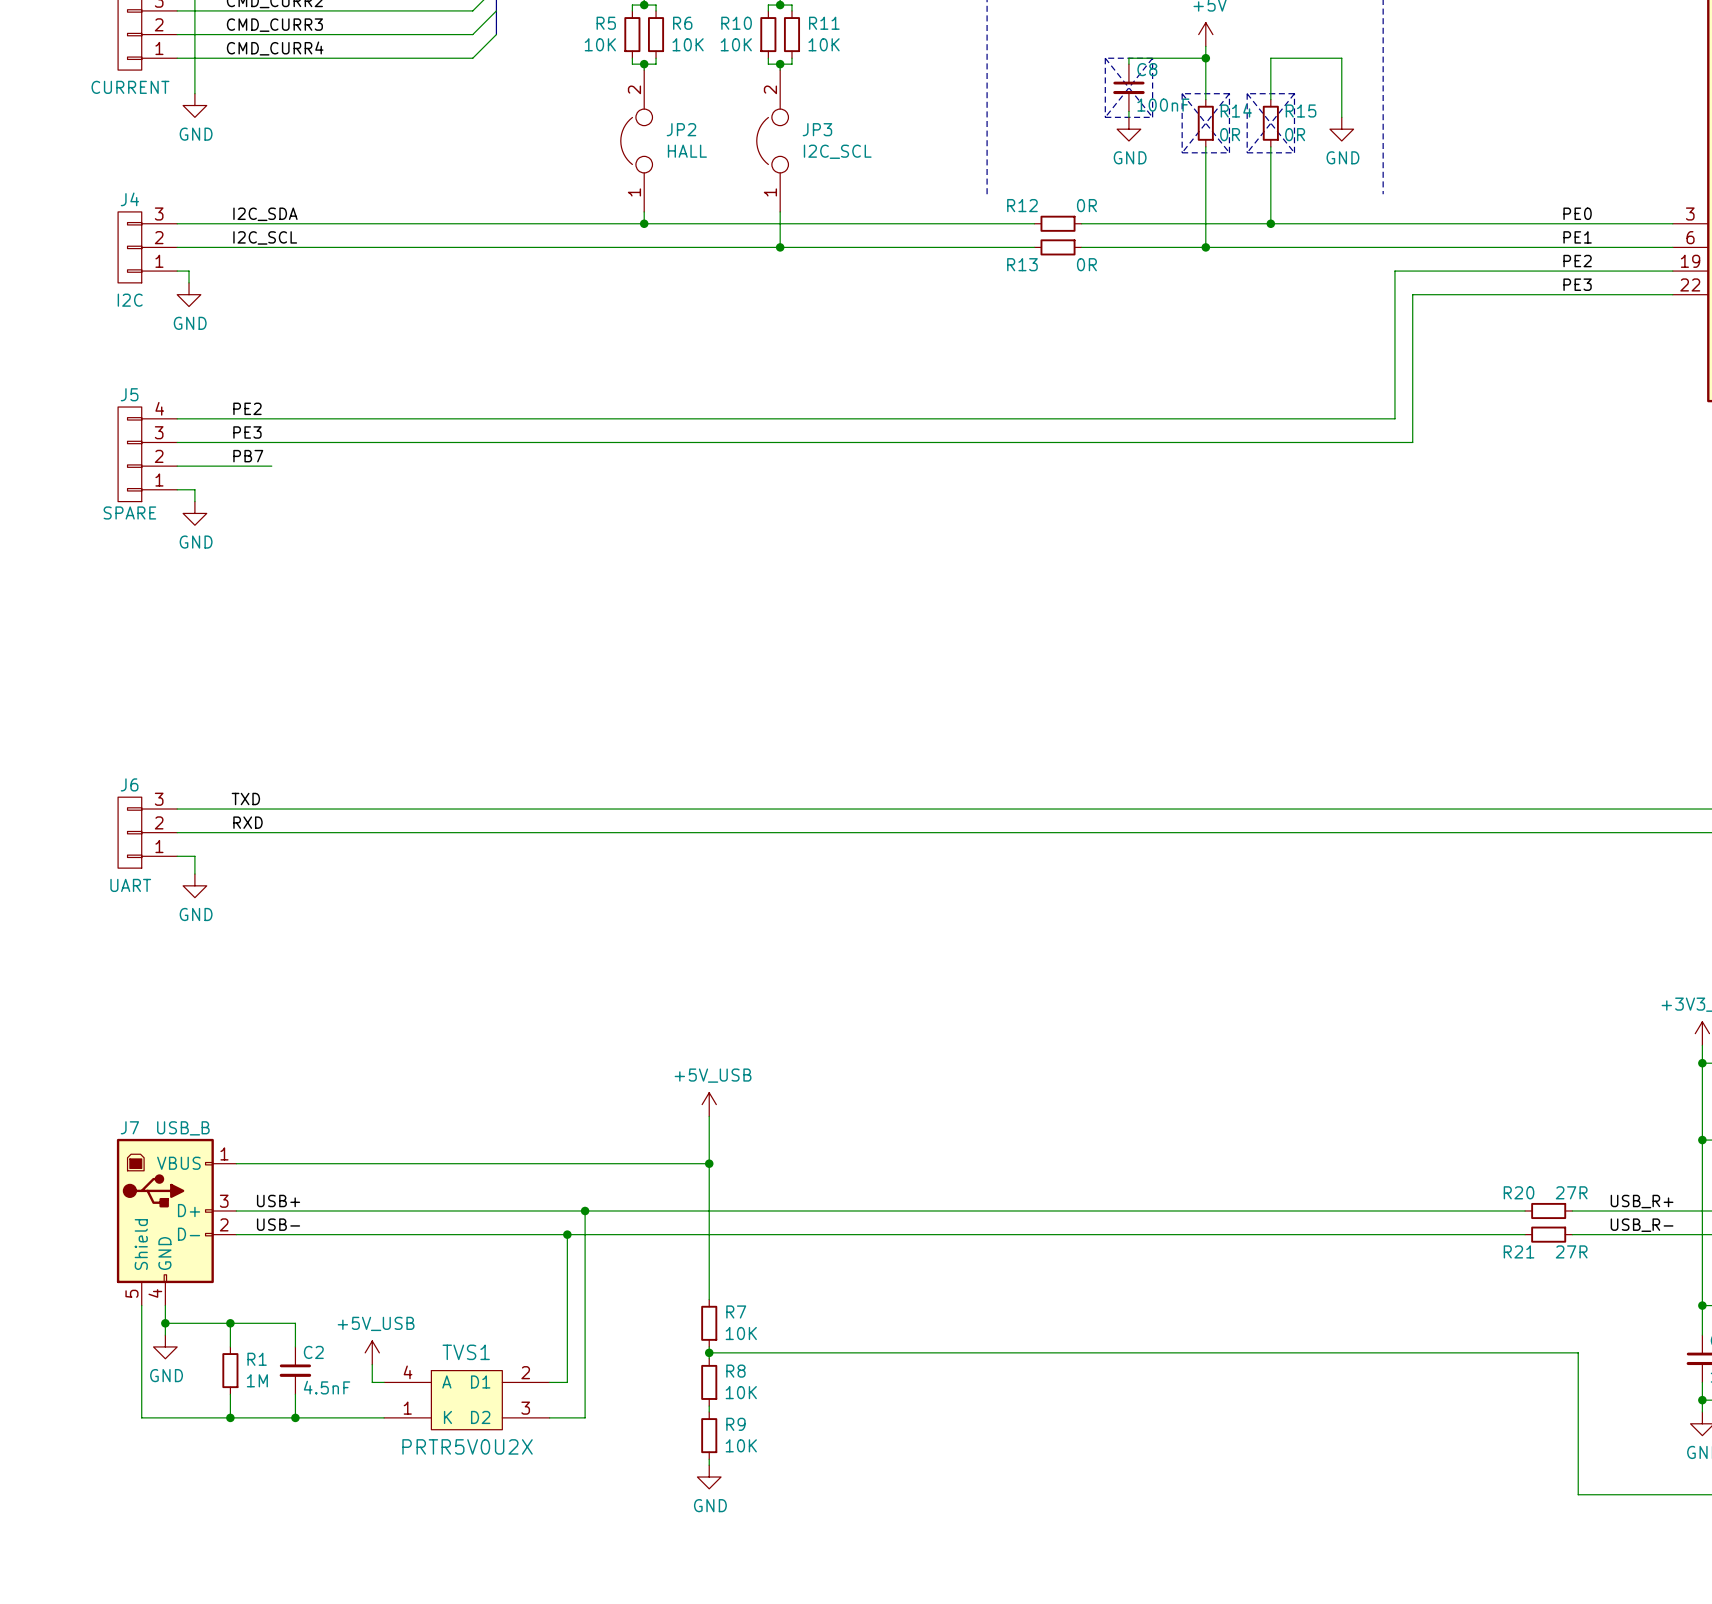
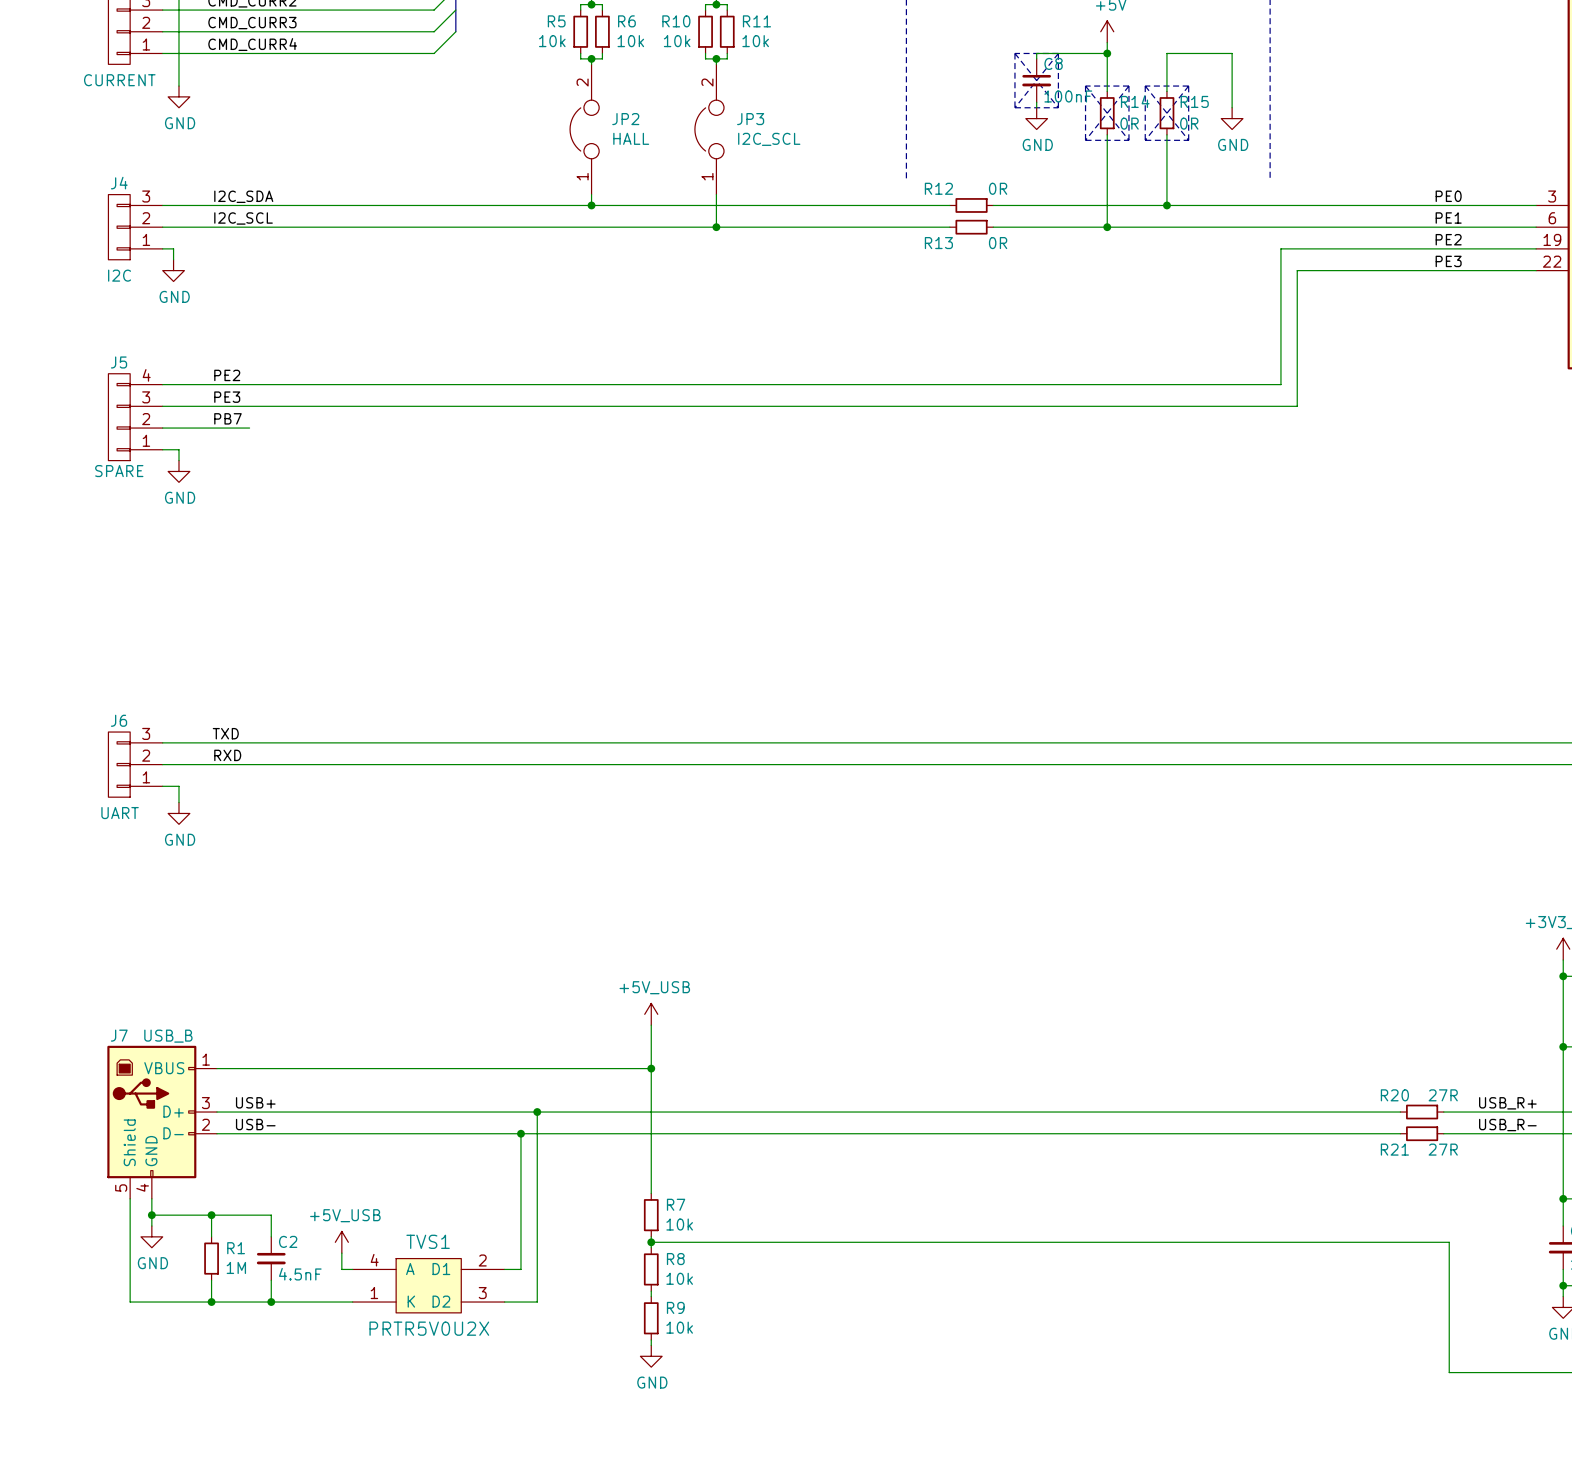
R5 value: 10K (600, 44) -> 10k (552, 41)
R6 value: 10K (688, 44) -> 10k (630, 41)
R10 value: 10K (736, 44) -> 10k (677, 41)
R11 value: 10K (824, 44) -> 10k (755, 41)
R7 value: 10K (741, 1333) -> 10k (679, 1224)
R8 value: 10K (741, 1392) -> 10k (679, 1278)
R9 value: 10K (741, 1445) -> 10k (679, 1327)

